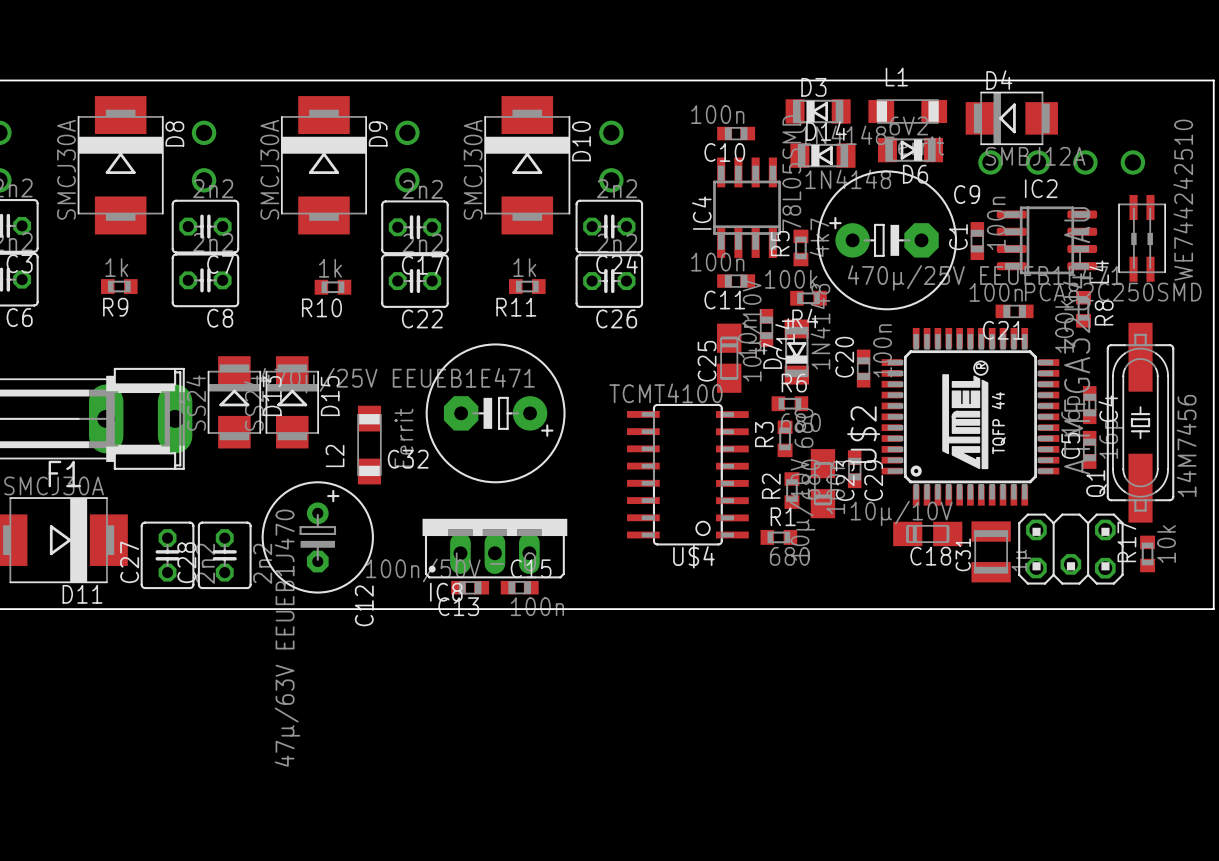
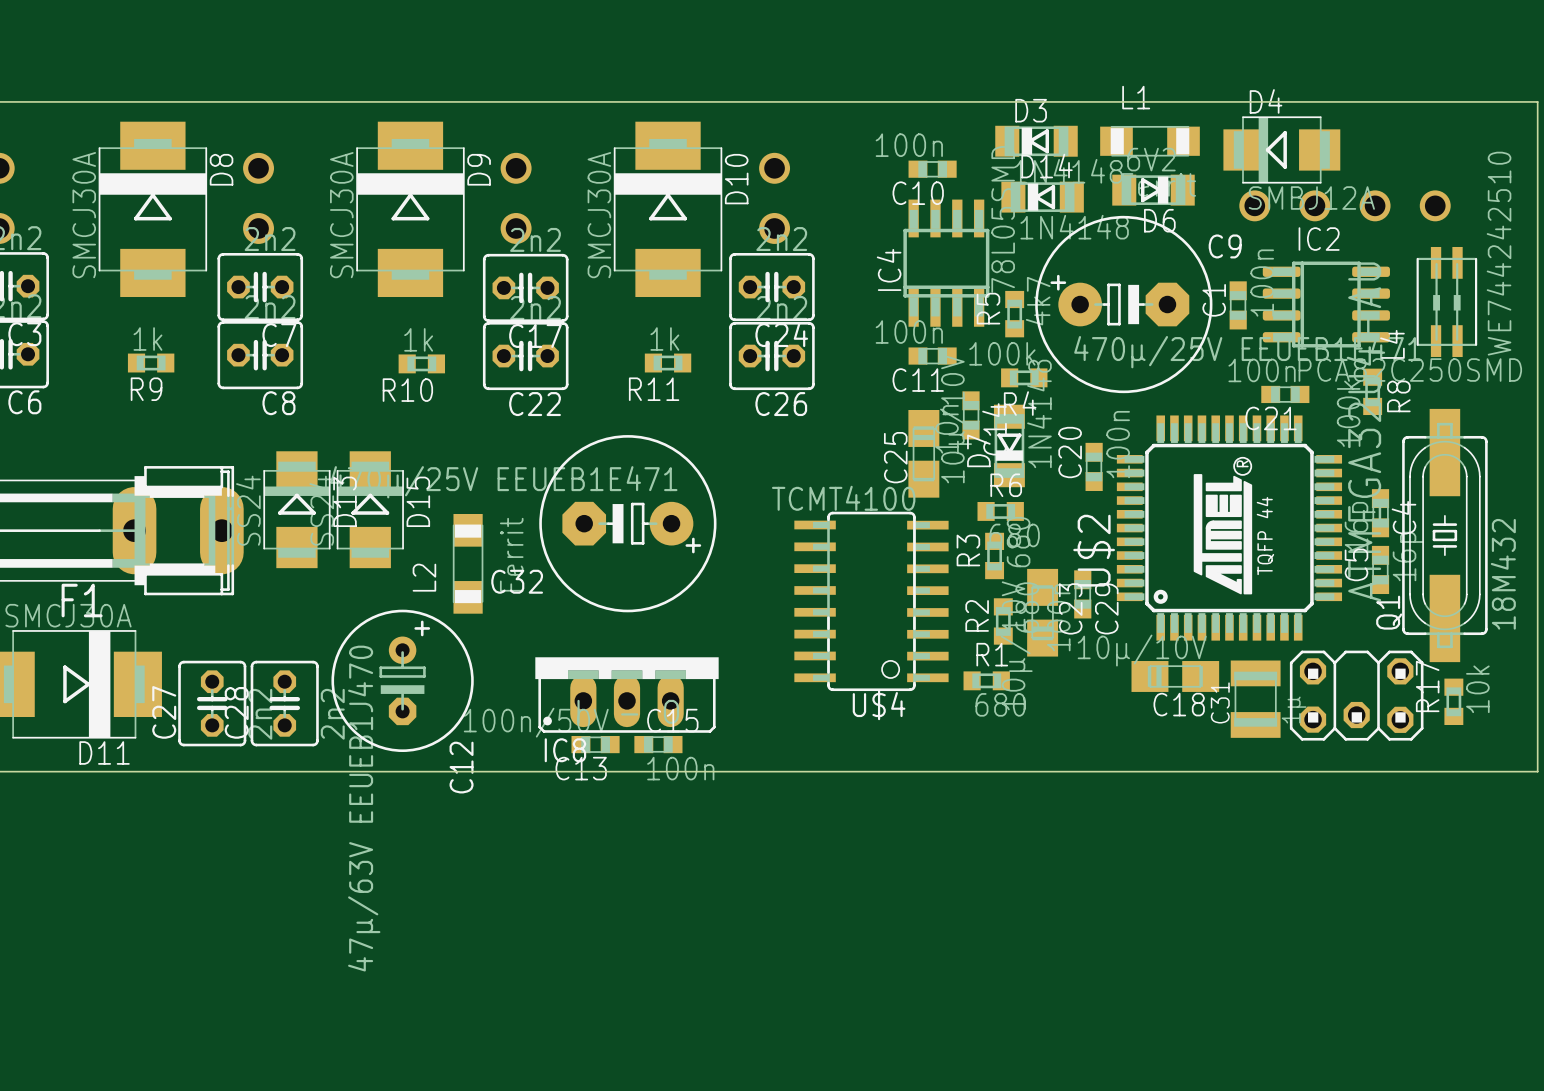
Q1 value: 14M7456 (1186, 445) -> 18M432 (1503, 574)

